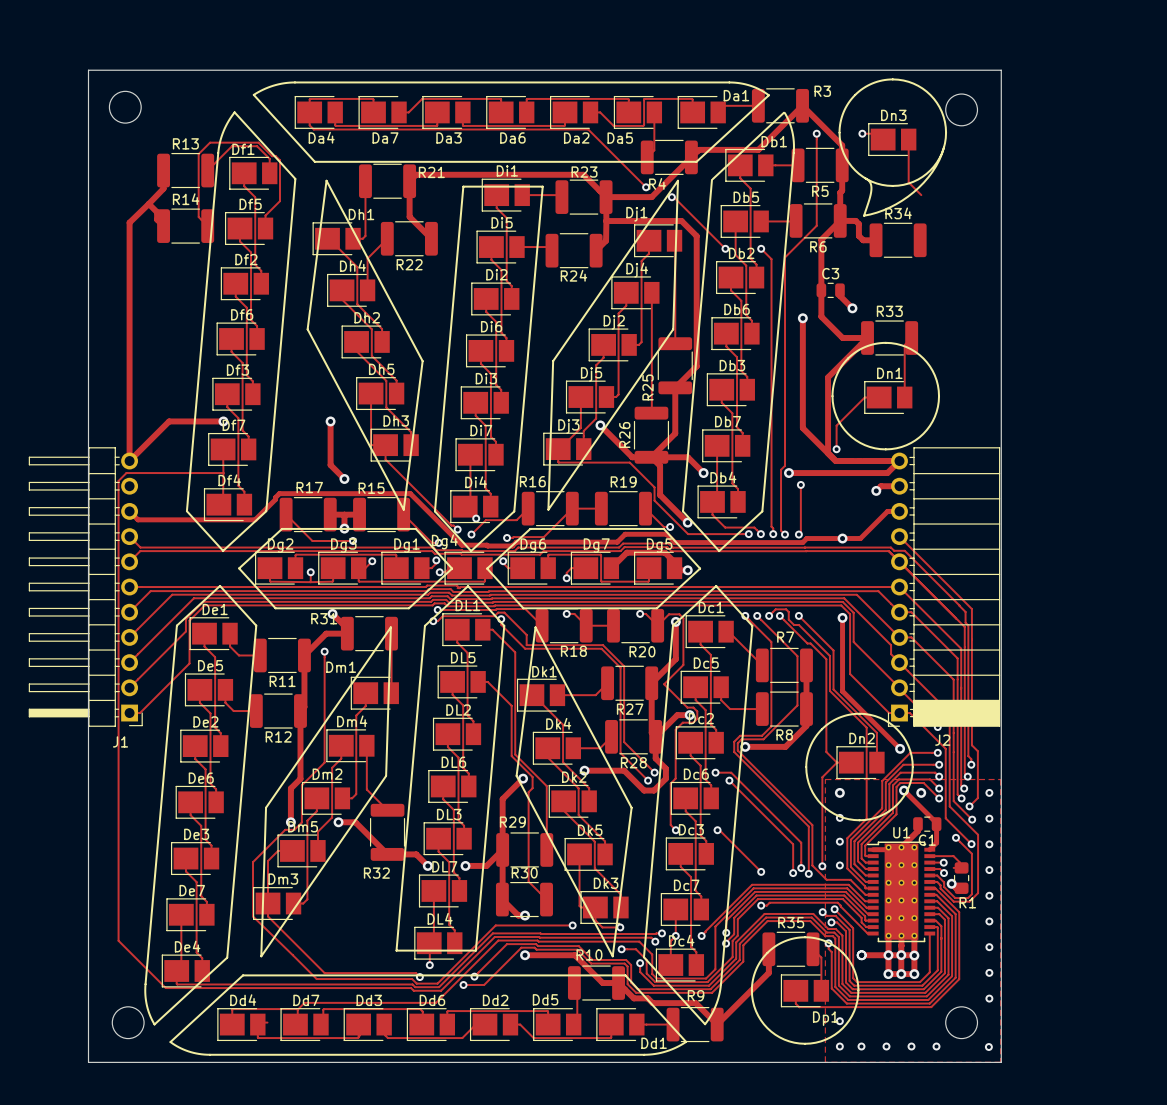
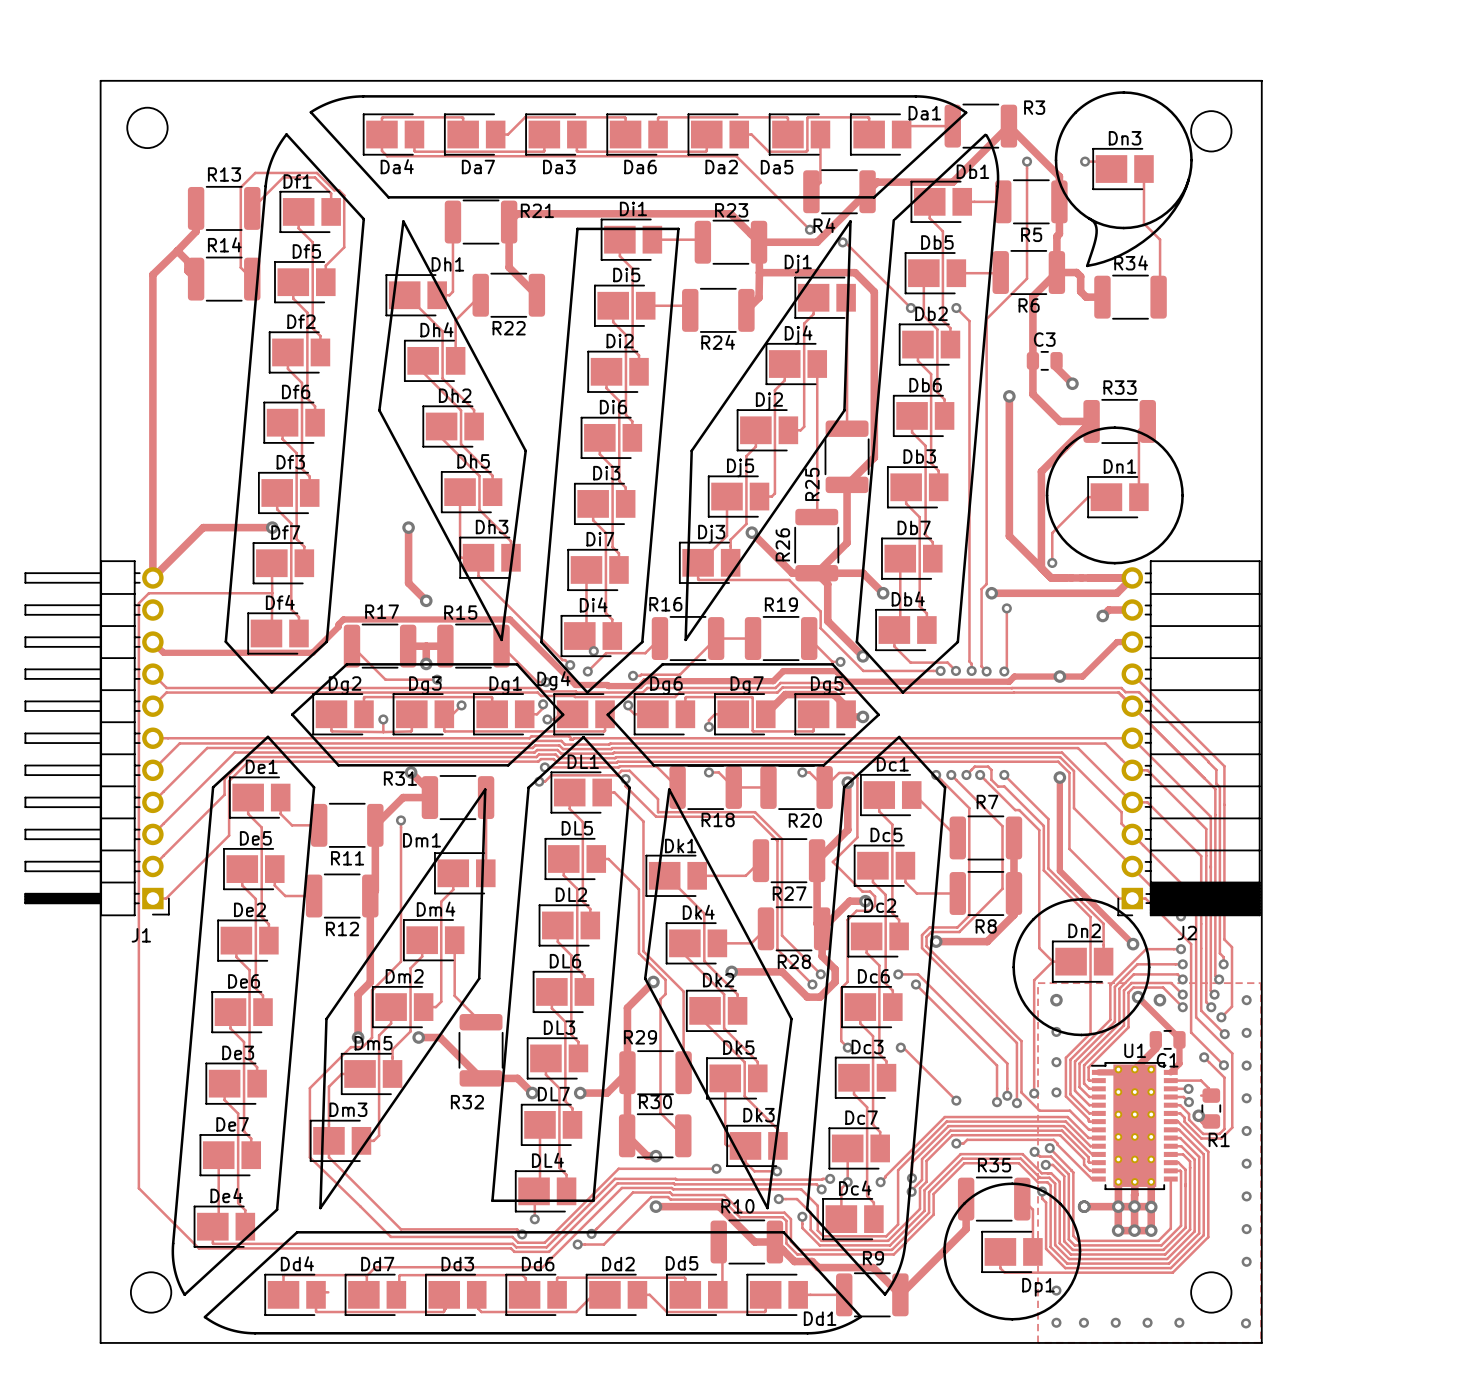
track: none -> (1160, 239) (1158, 297)

